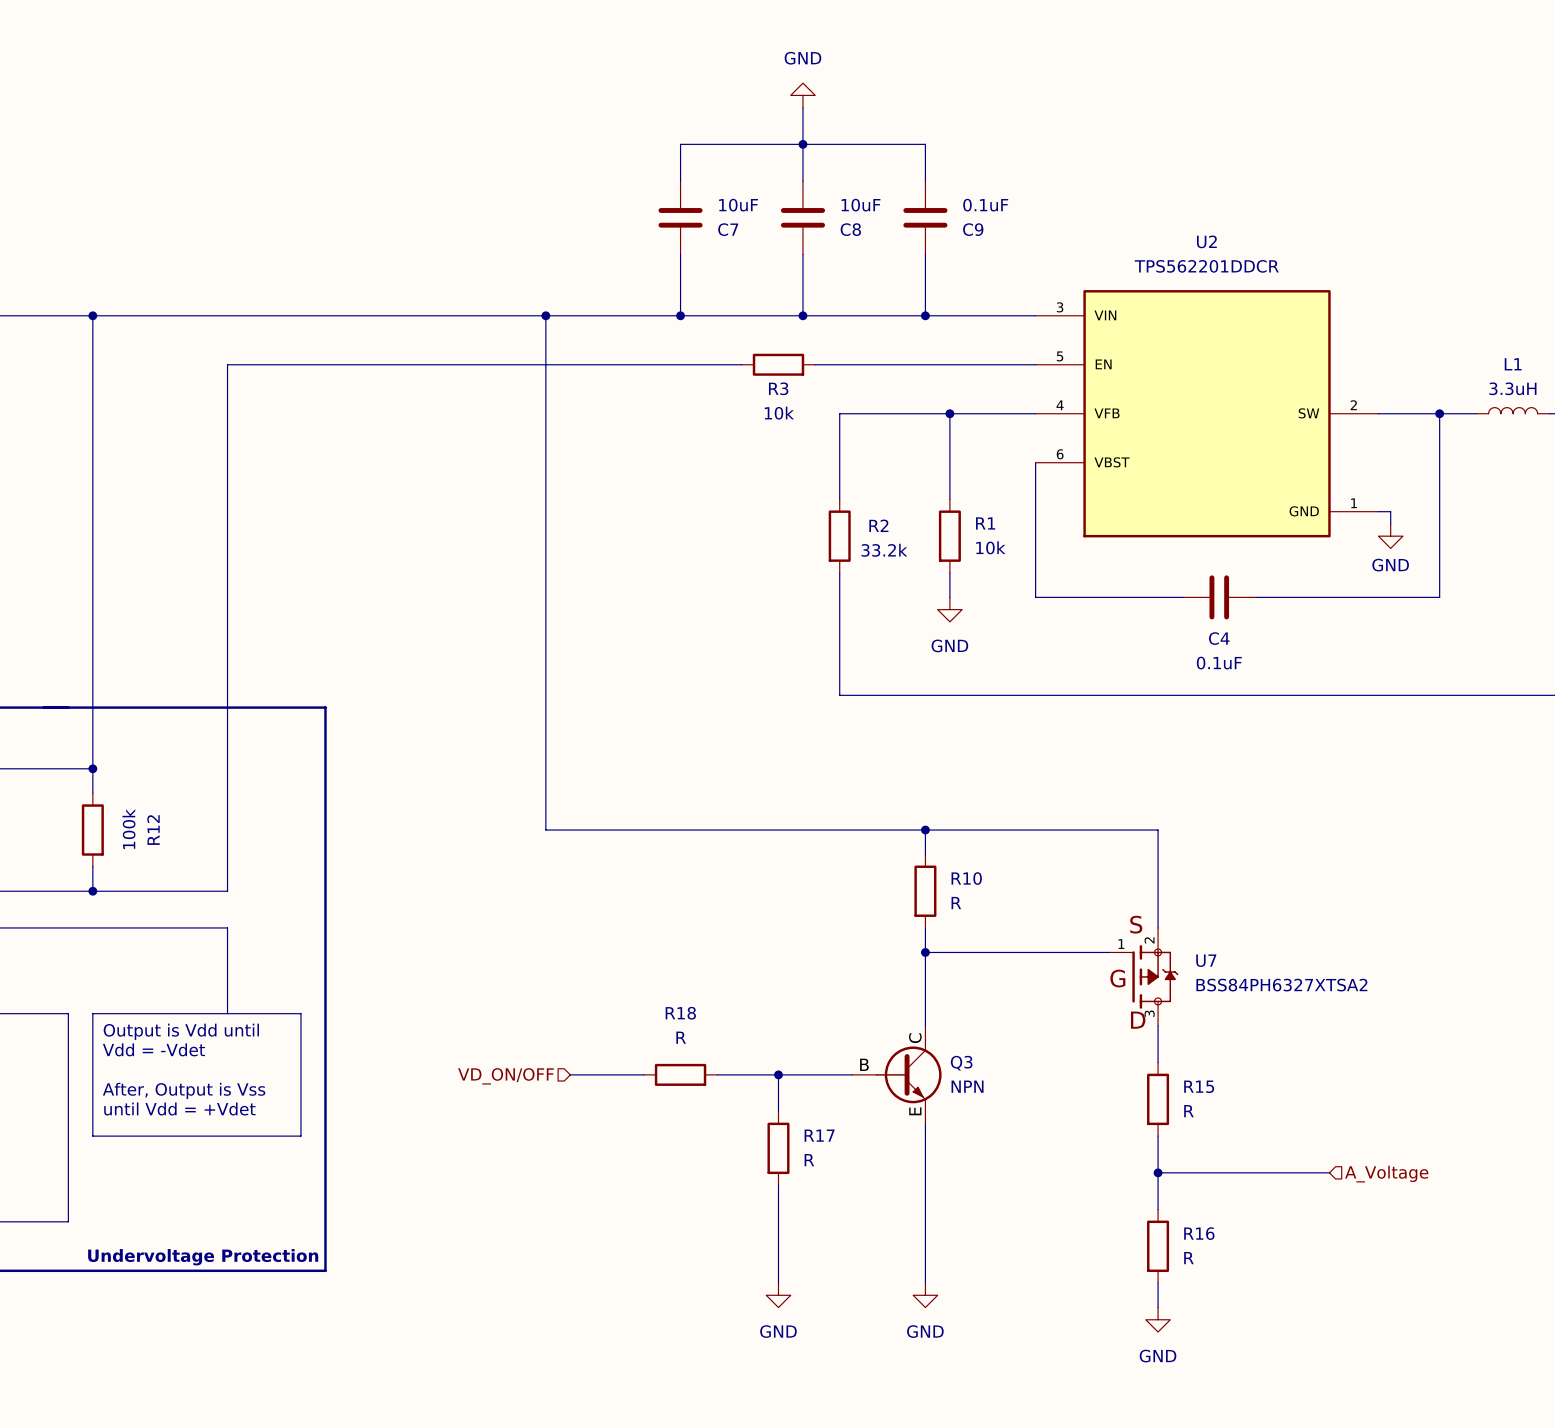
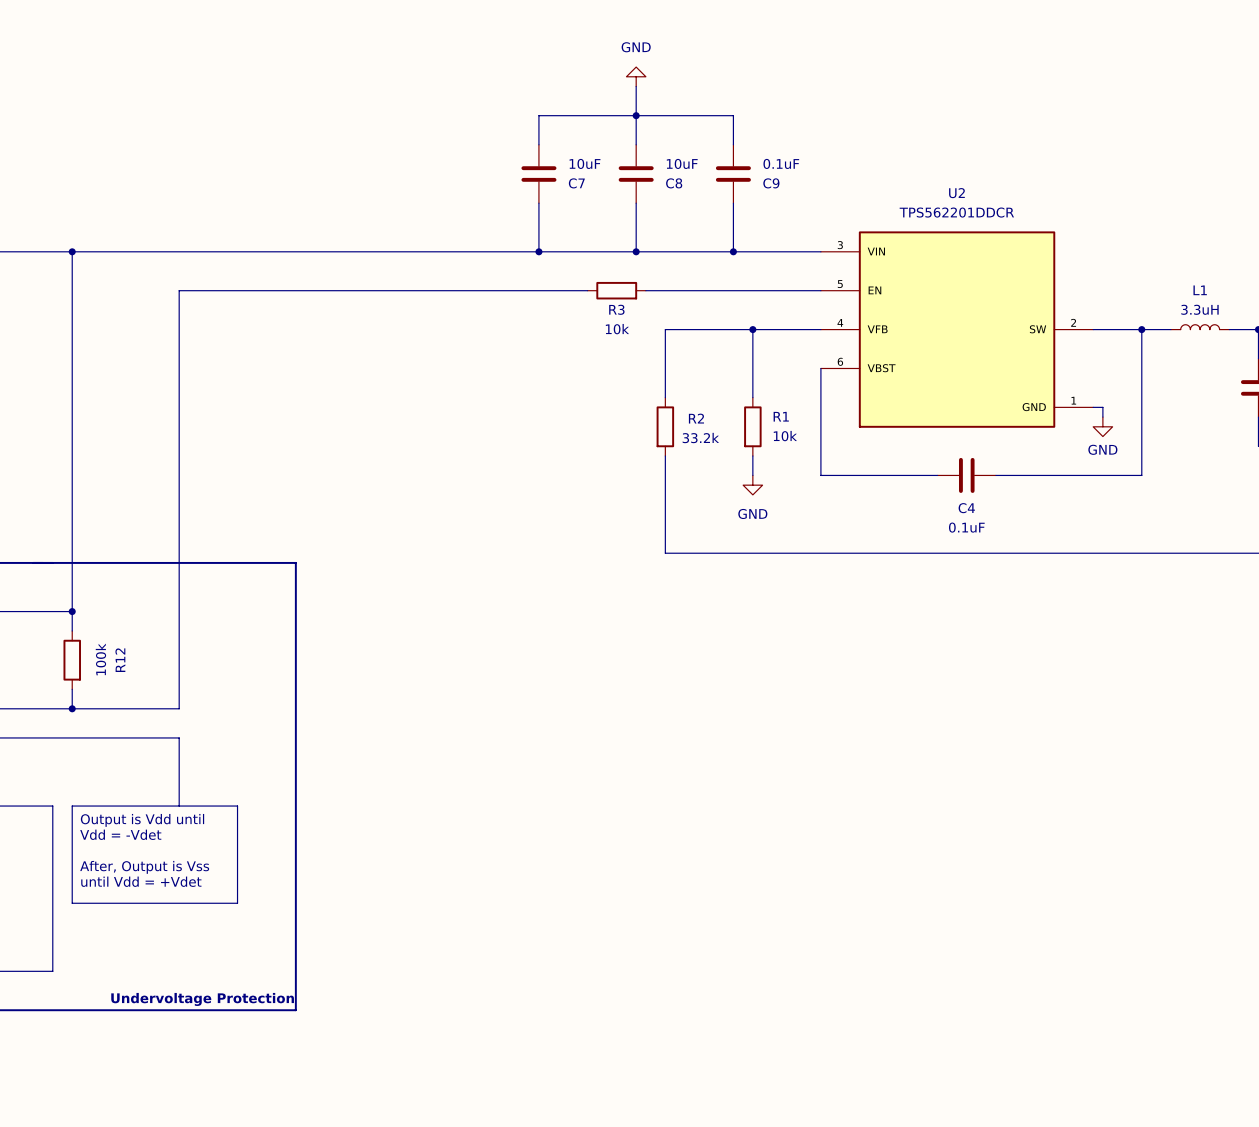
wire: (545, 315) (545, 830) (1158, 830) (1158, 927) -> none
junction: (545, 315) -> none
line: (325, 707) (325, 1270) -> (256, 562) (295, 562) (295, 1010) (256, 1010)
wire: (925, 830) (925, 854) -> none
junction: (925, 830) -> none
R10: R (925, 891) -> none
wire: (925, 927) (925, 1025) -> none
wire: (925, 952) (1109, 952) -> none
junction: (925, 952) -> none
U7: BSS84PH6327XTSA2 (1143, 976) -> none
wire: (1158, 1025) (1158, 1062) -> none
wire: (570, 1074) (643, 1074) -> none
R18: R (680, 1074) -> none
wire: (717, 1074) (851, 1074) -> none
wire: (778, 1074) (778, 1111) -> none
junction: (778, 1074) -> none
Q3: NPN (896, 1074) -> none
hierarchical label: VD_ON/OFF (505, 1076) -> none
R15: R (1158, 1099) -> none
wire: (925, 1123) (925, 1283) -> none
wire: (1158, 1136) (1158, 1209) -> none
R17: R (778, 1148) -> none
wire: (1158, 1172) (1329, 1172) -> none
junction: (1158, 1172) -> none
hierarchical label: A_Voltage (1386, 1174) -> none
wire: (778, 1185) (778, 1283) -> none
R16: R (1158, 1246) -> none
text position: Undervoltage Protection (203, 1257) -> Undervoltage Protection (202, 999)
wire: (1158, 1283) (1158, 1307) -> none
power symbol: GND (778, 1295) -> none
power symbol: GND (925, 1295) -> none
power symbol: GND (1158, 1319) -> none

